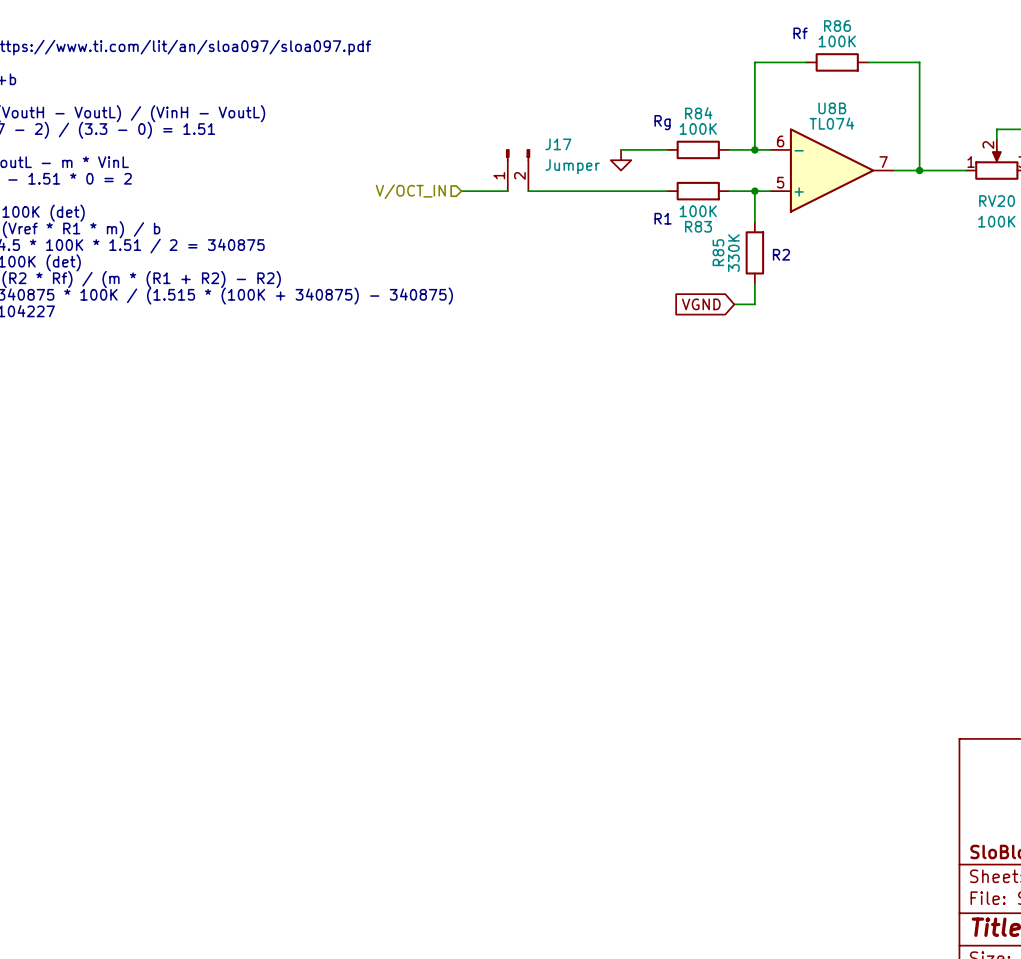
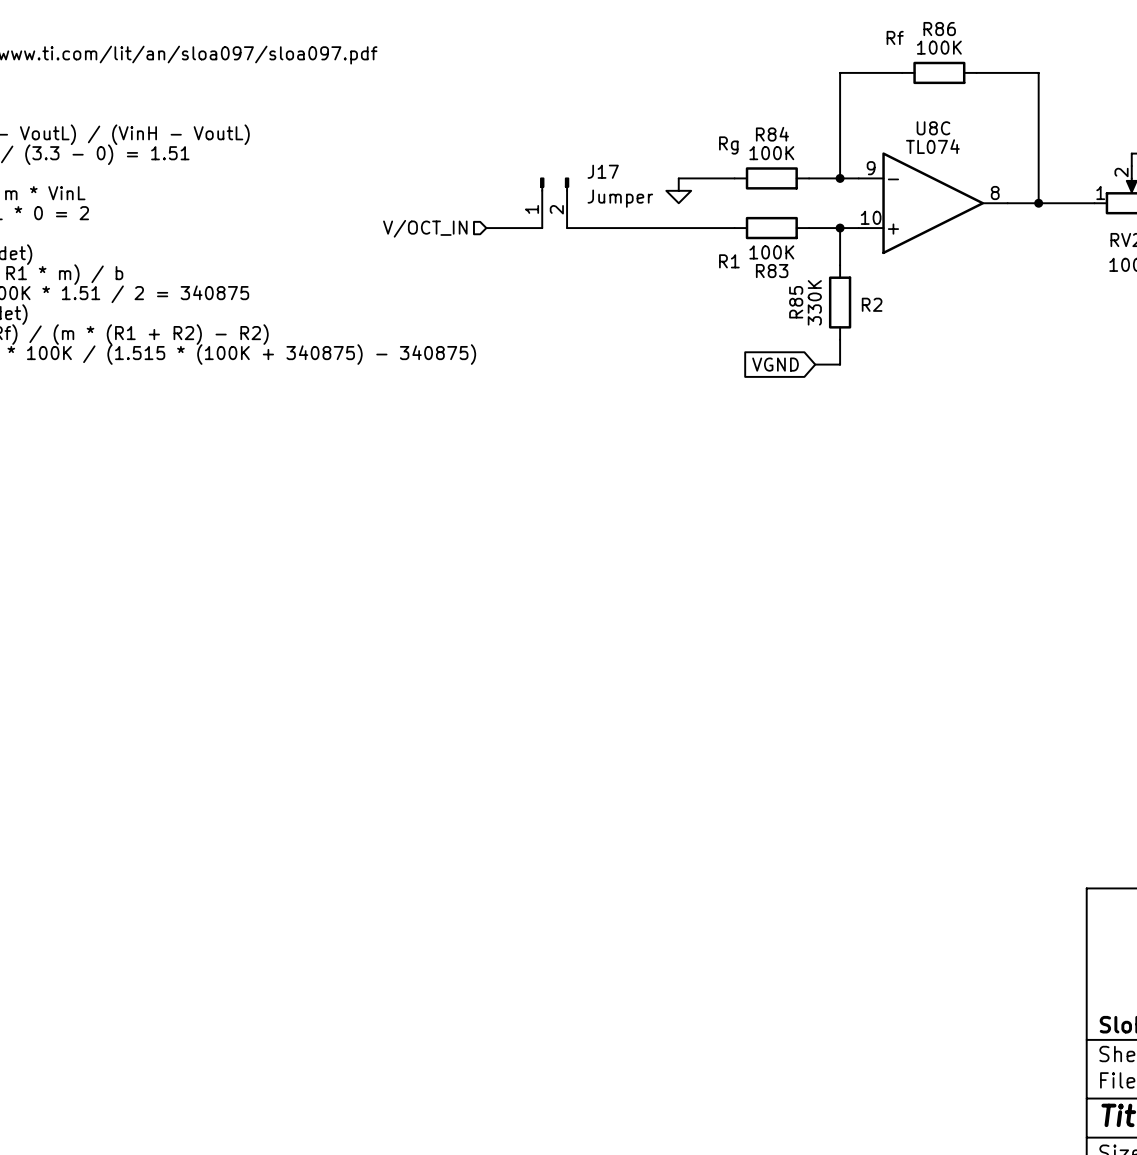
U8B name: U8B (832, 108) -> U8C (933, 128)
U8B pin number: 6 (780, 141) -> 9 (871, 168)
U8B pin number: 7 (883, 162) -> 8 (995, 193)
U8B pin number: 5 (780, 182) -> 10 (871, 217)

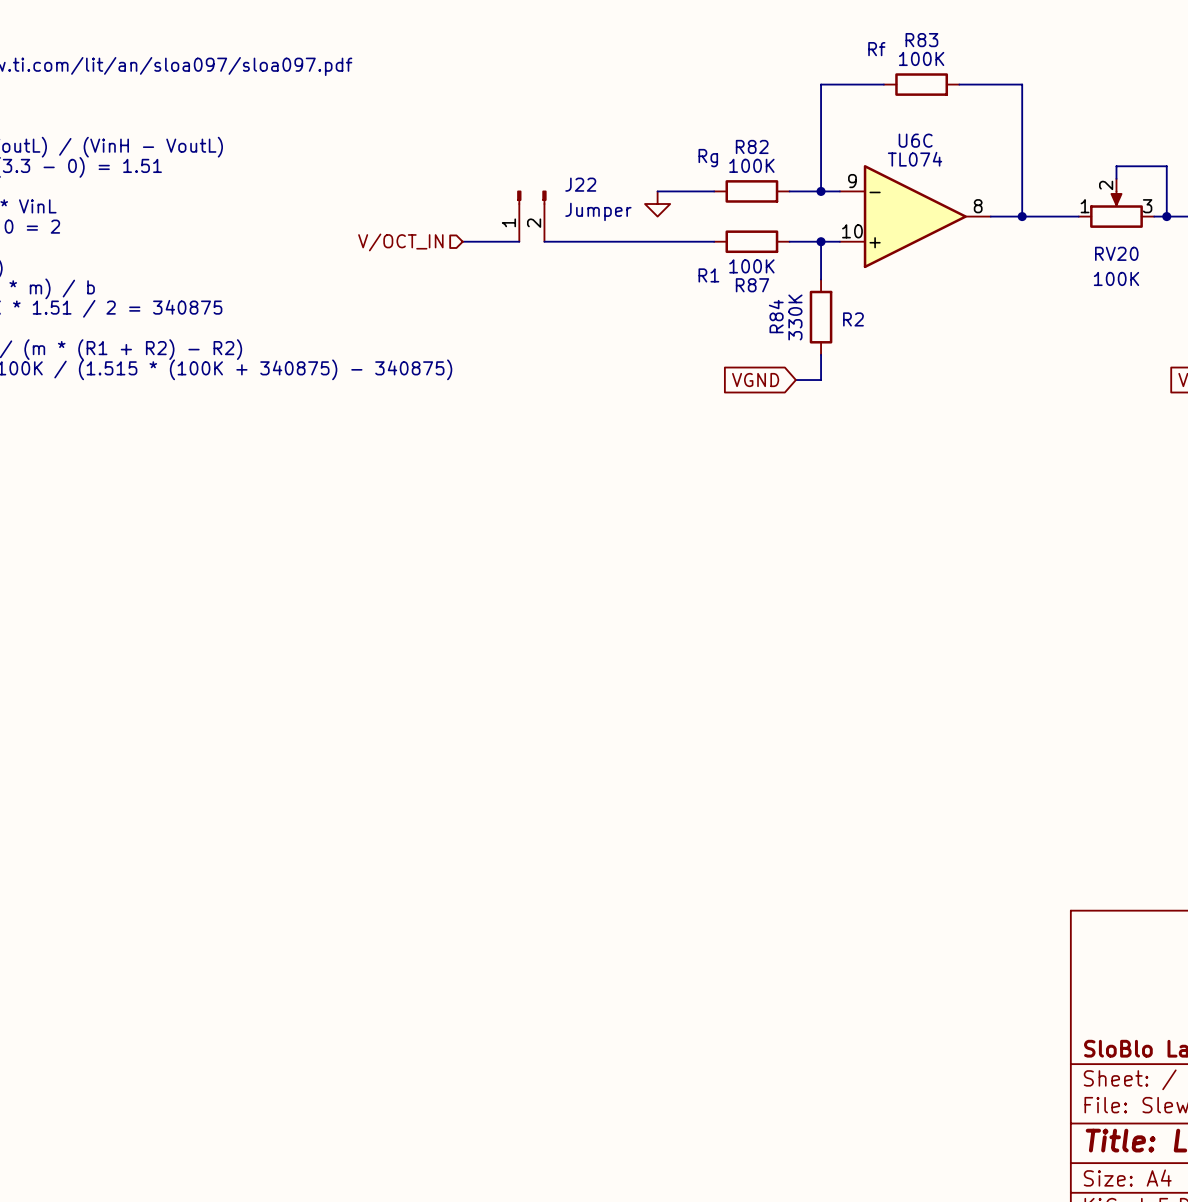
R86 name: R86 (939, 29) -> R83 (921, 40)
U8C name: U8C (933, 128) -> U6C (915, 140)
R84 name: R84 (772, 134) -> R82 (752, 146)
J17 name: J17 (603, 171) -> J22 (580, 184)
R83 name: R83 (772, 271) -> R87 (752, 285)
R85 name: R85 (796, 302) -> R84 (776, 316)

